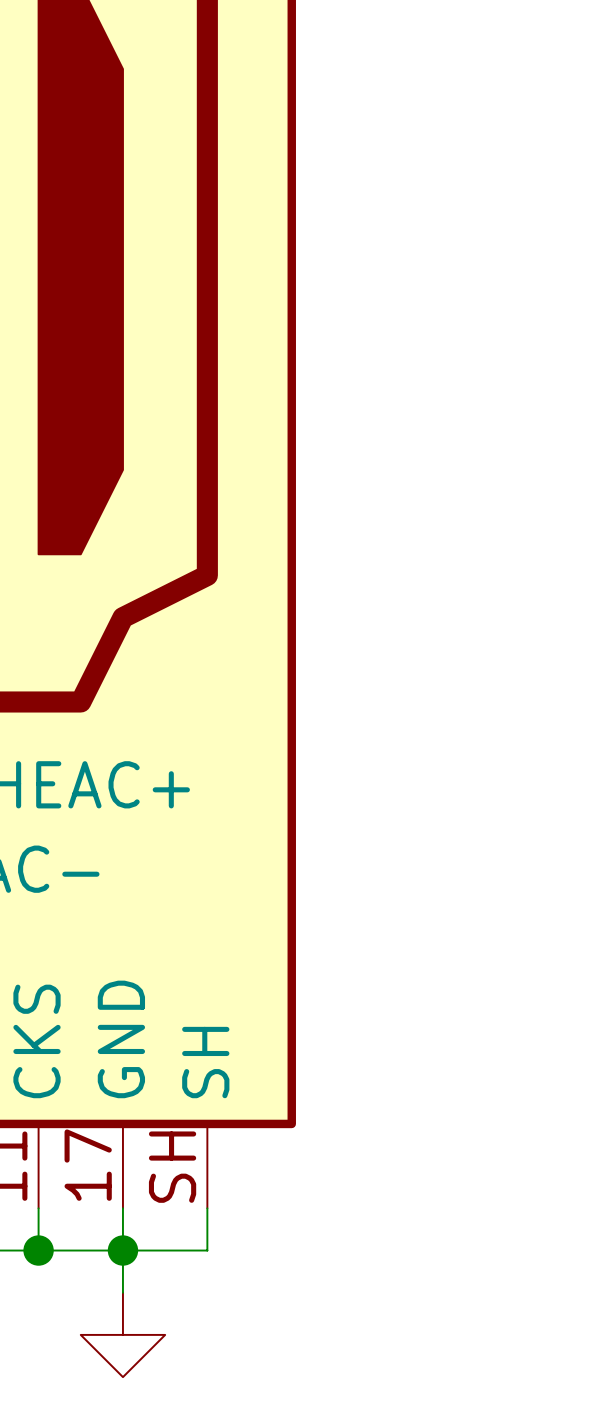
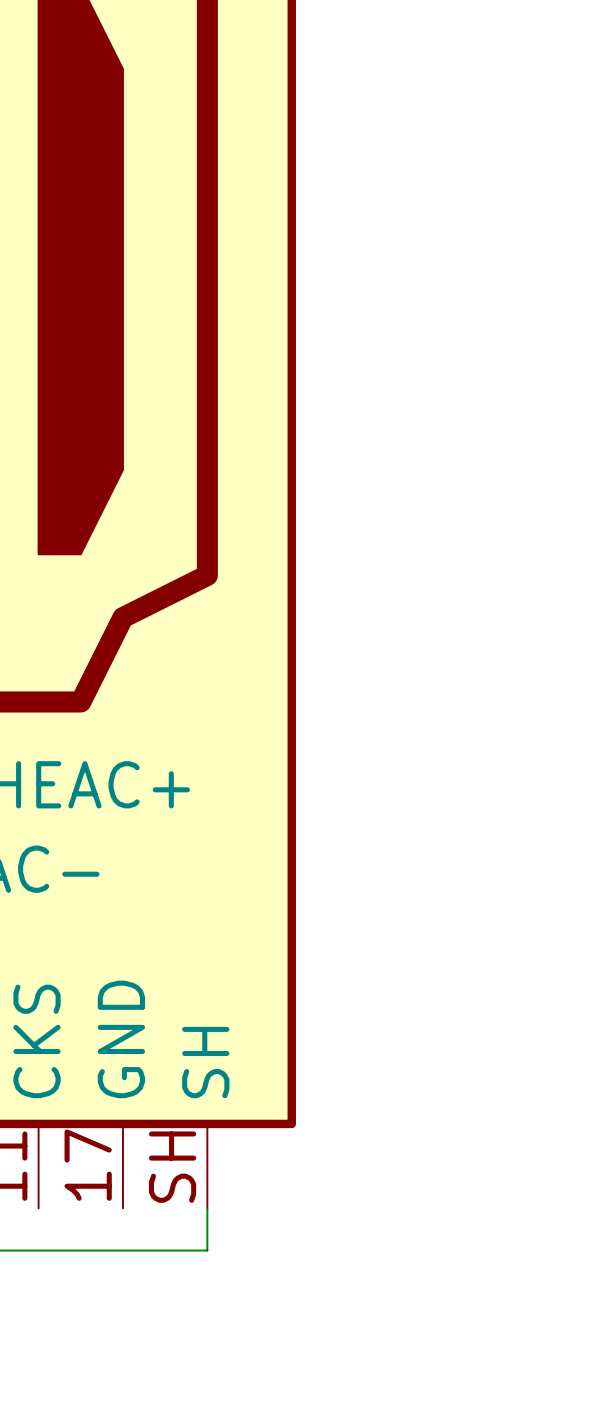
wire: (38, 1208) (38, 1250) -> none
wire: (122, 1208) (122, 1292) -> none
junction: (38, 1250) -> none
junction: (122, 1250) -> none
power symbol: (122, 1334) -> none

